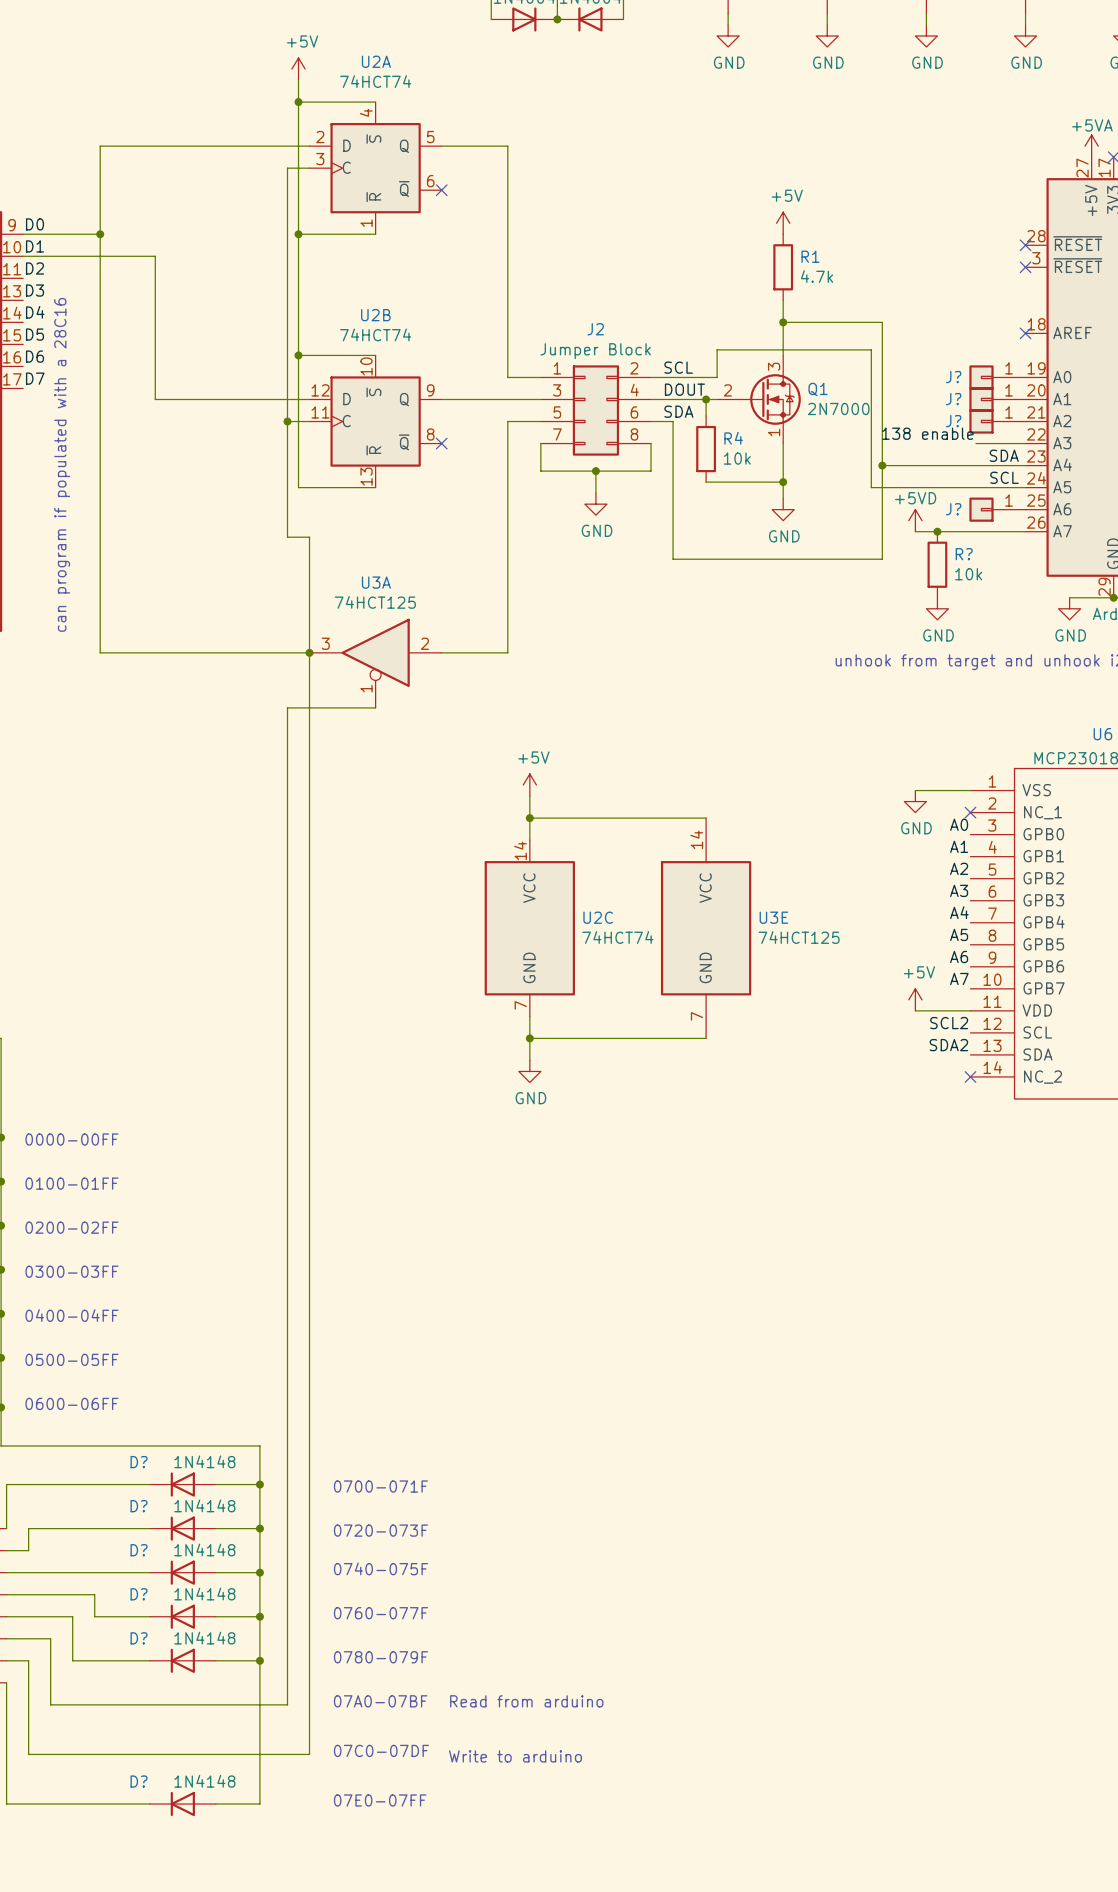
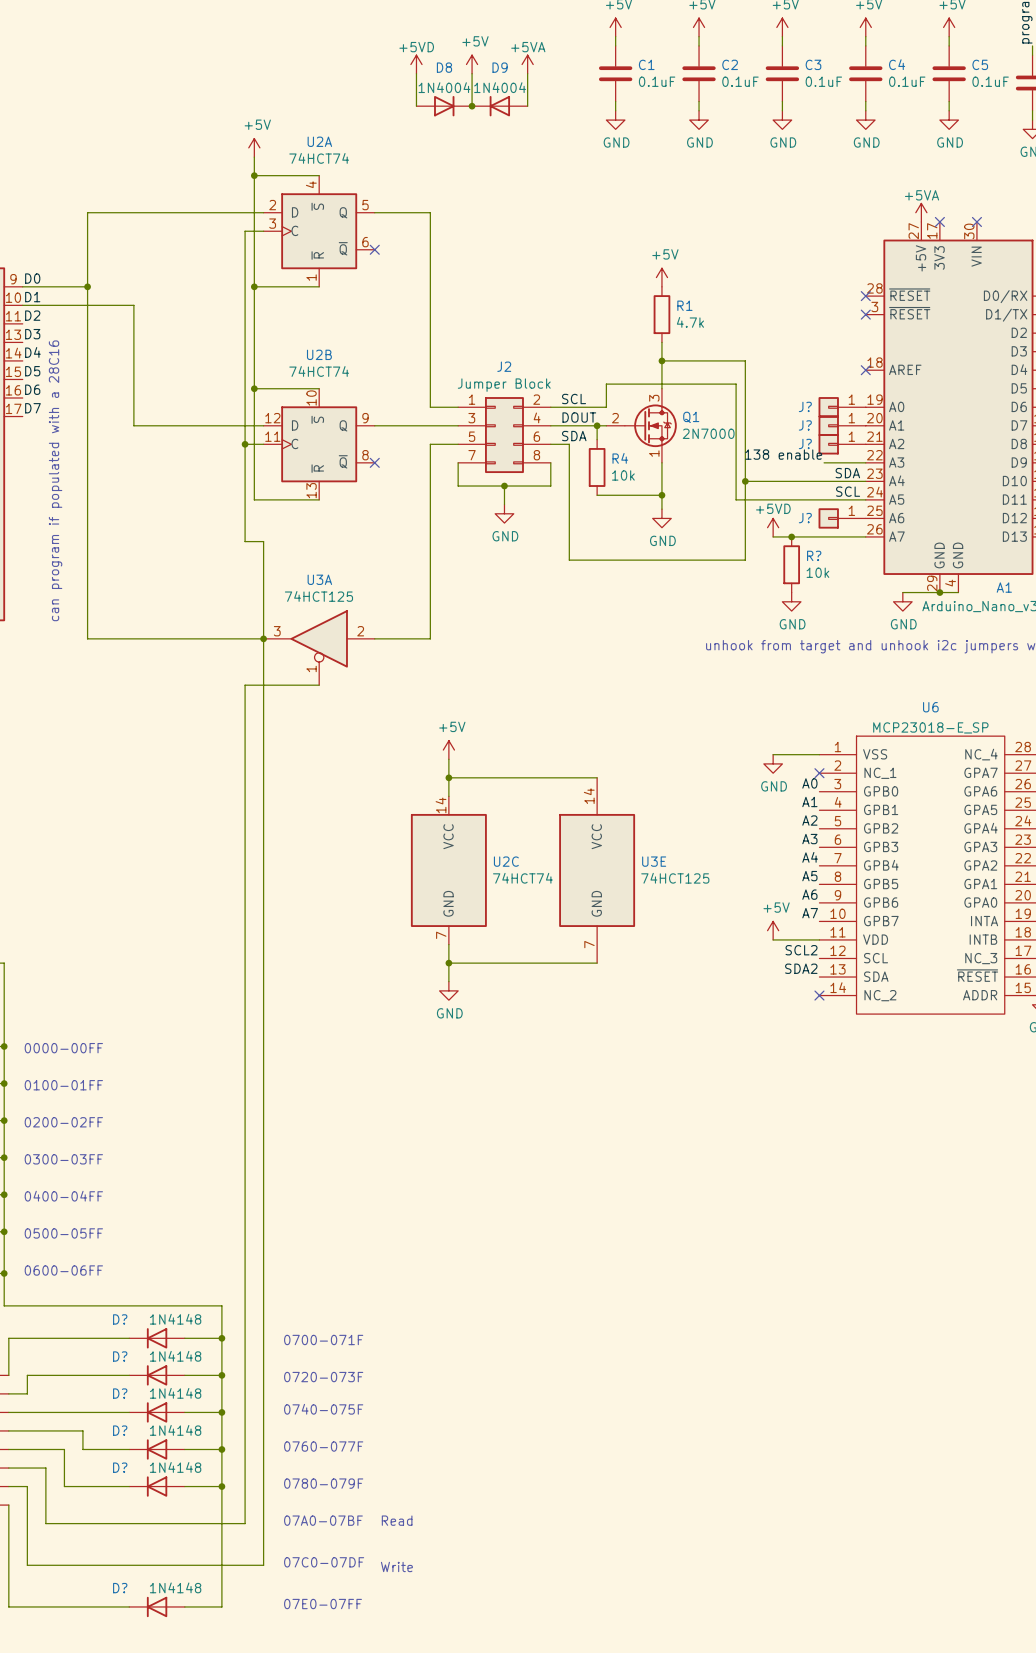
text: Read from arduino (526, 1701) -> Read (397, 1520)
text: Write to arduino (515, 1756) -> Write (396, 1566)

